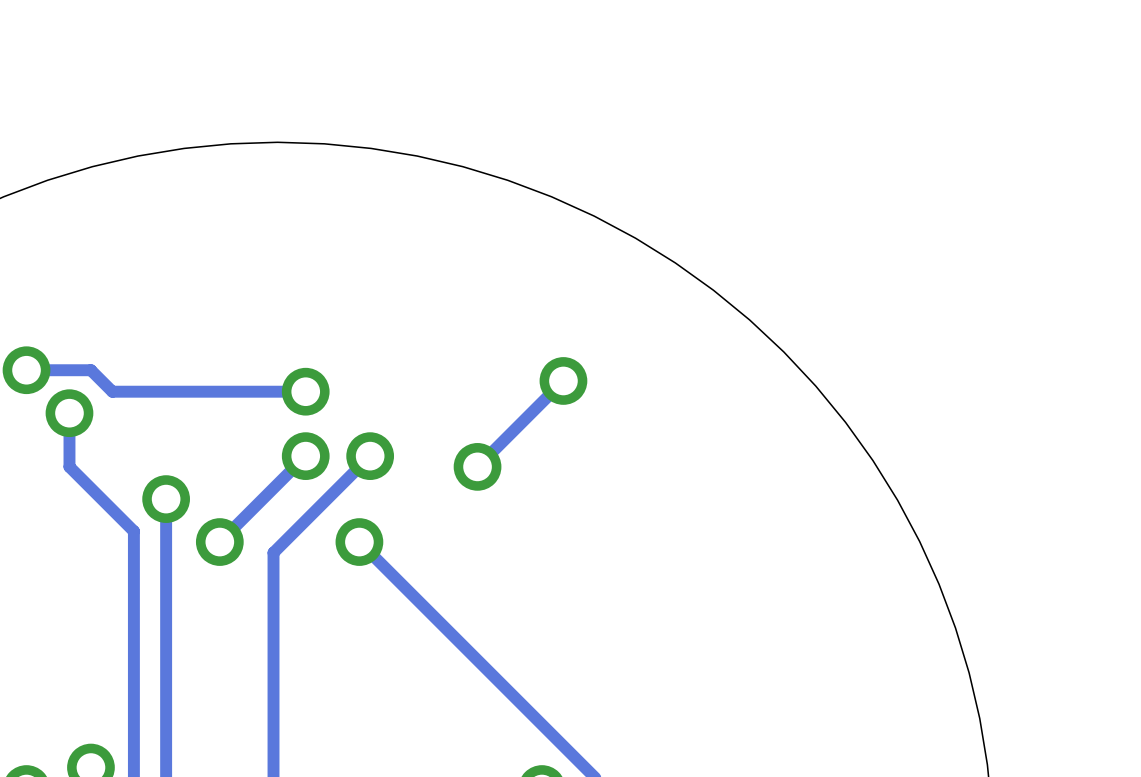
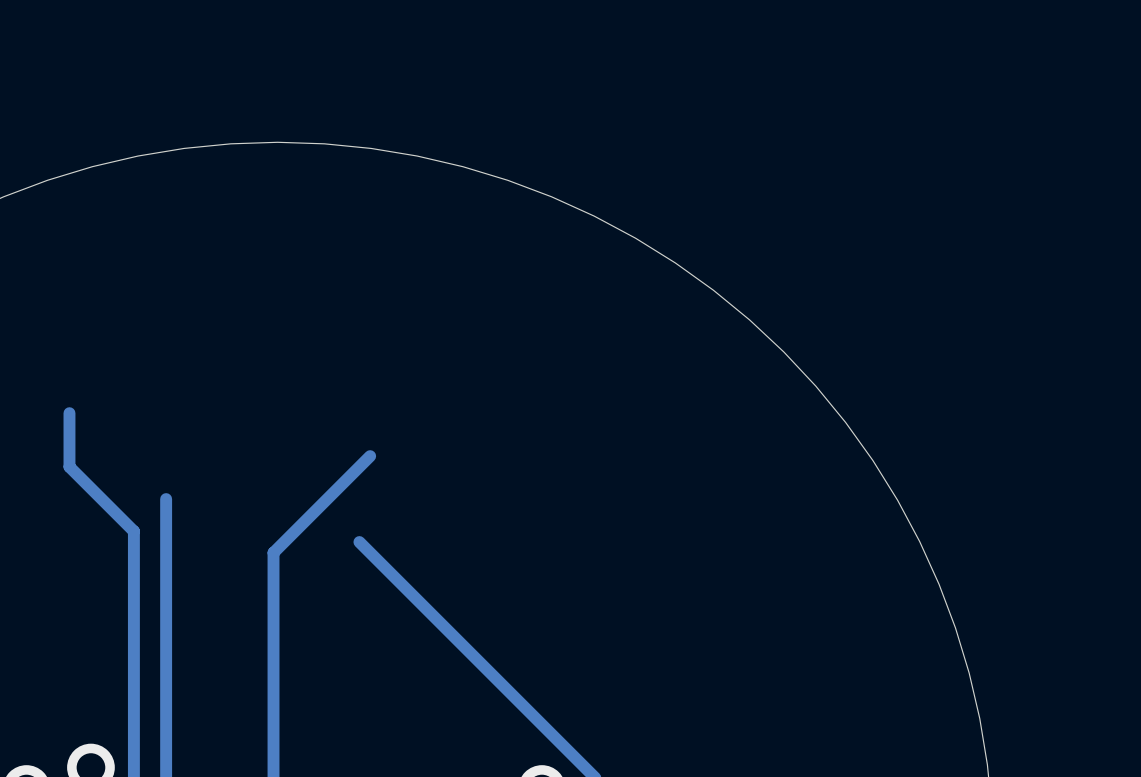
track: (26, 370) (90, 370) (112, 391) (305, 391) -> none
via: (26, 370) -> none
track: (563, 380) (477, 466) -> none
via: (563, 380) -> none
via: (305, 391) -> none
via: (69, 413) -> none
track: (305, 456) (219, 542) -> none
via: (305, 456) -> none
via: (370, 456) -> none
via: (477, 466) -> none
via: (166, 499) -> none
via: (219, 542) -> none
via: (359, 542) -> none

